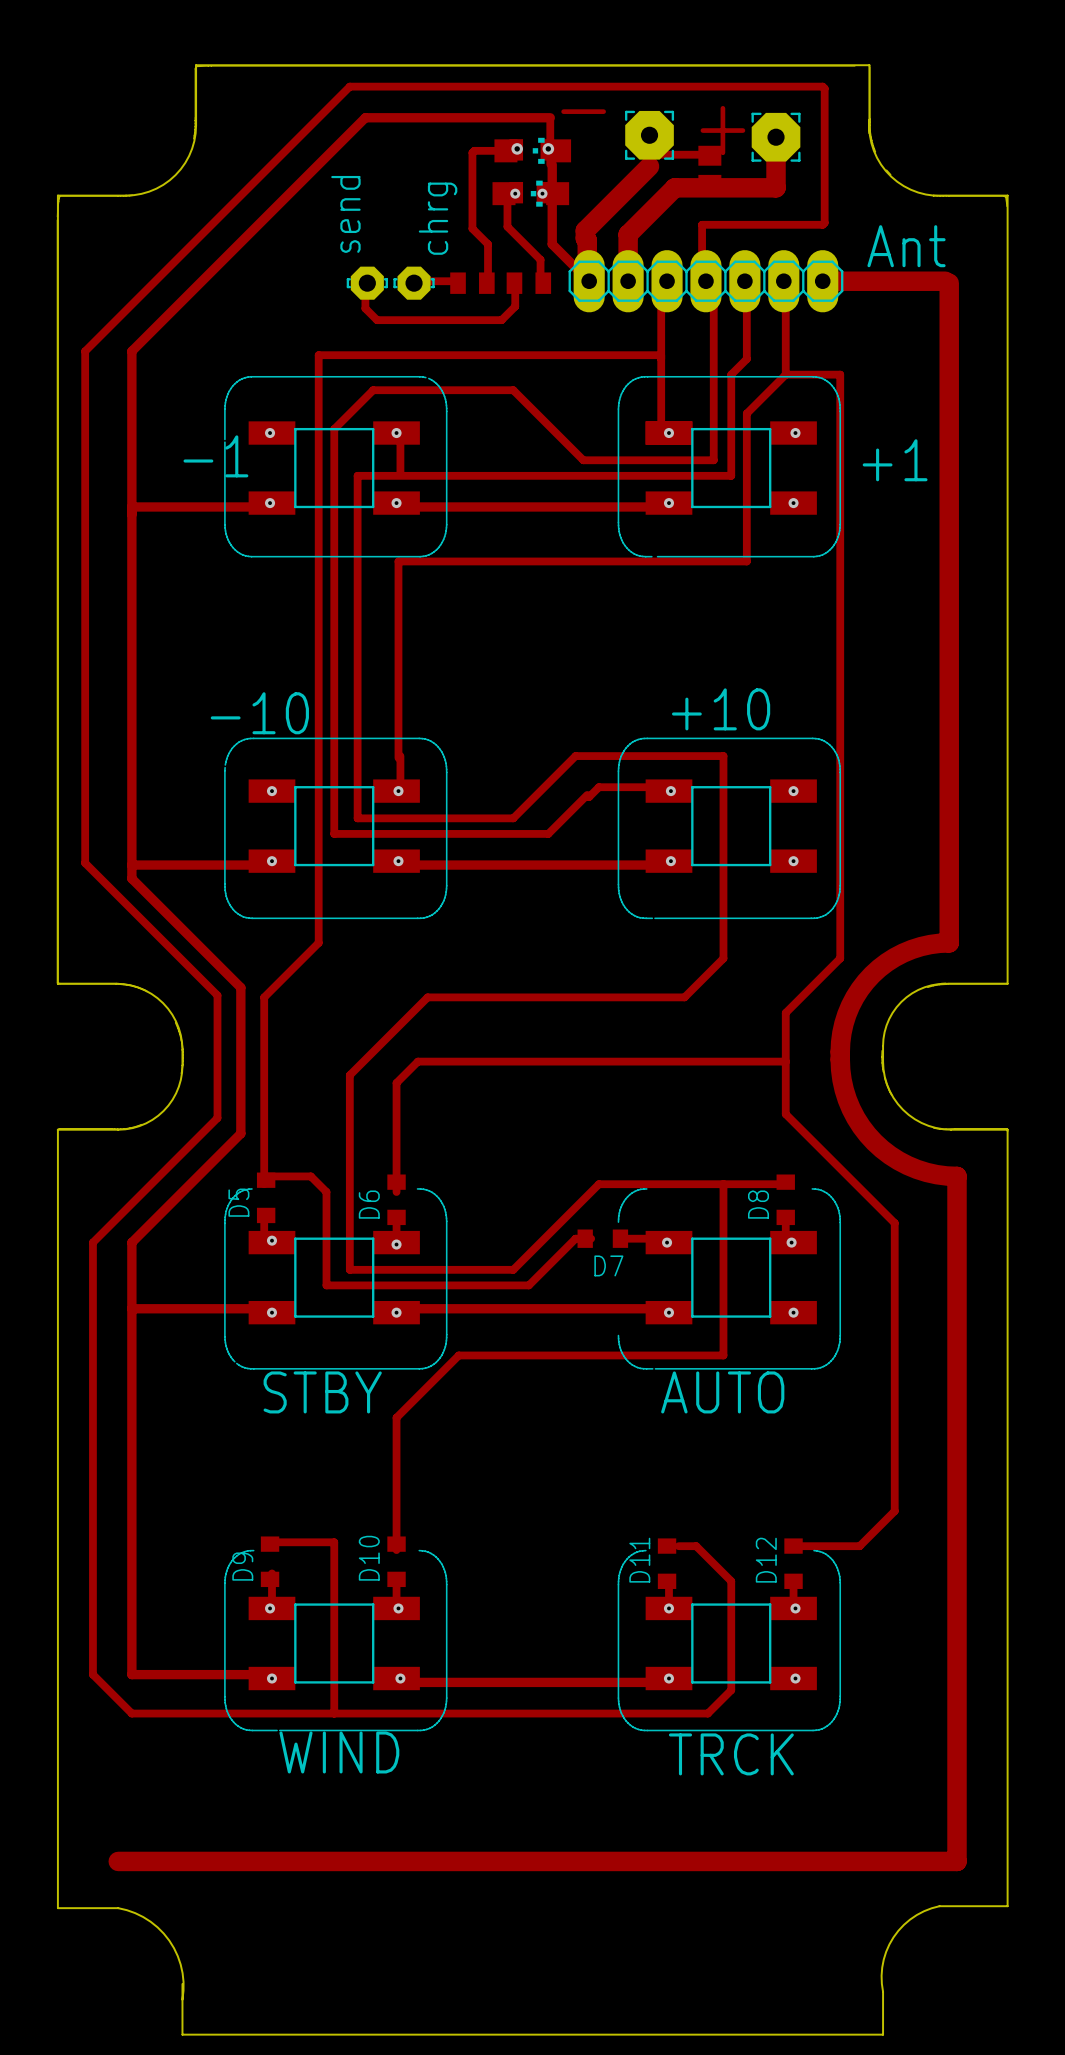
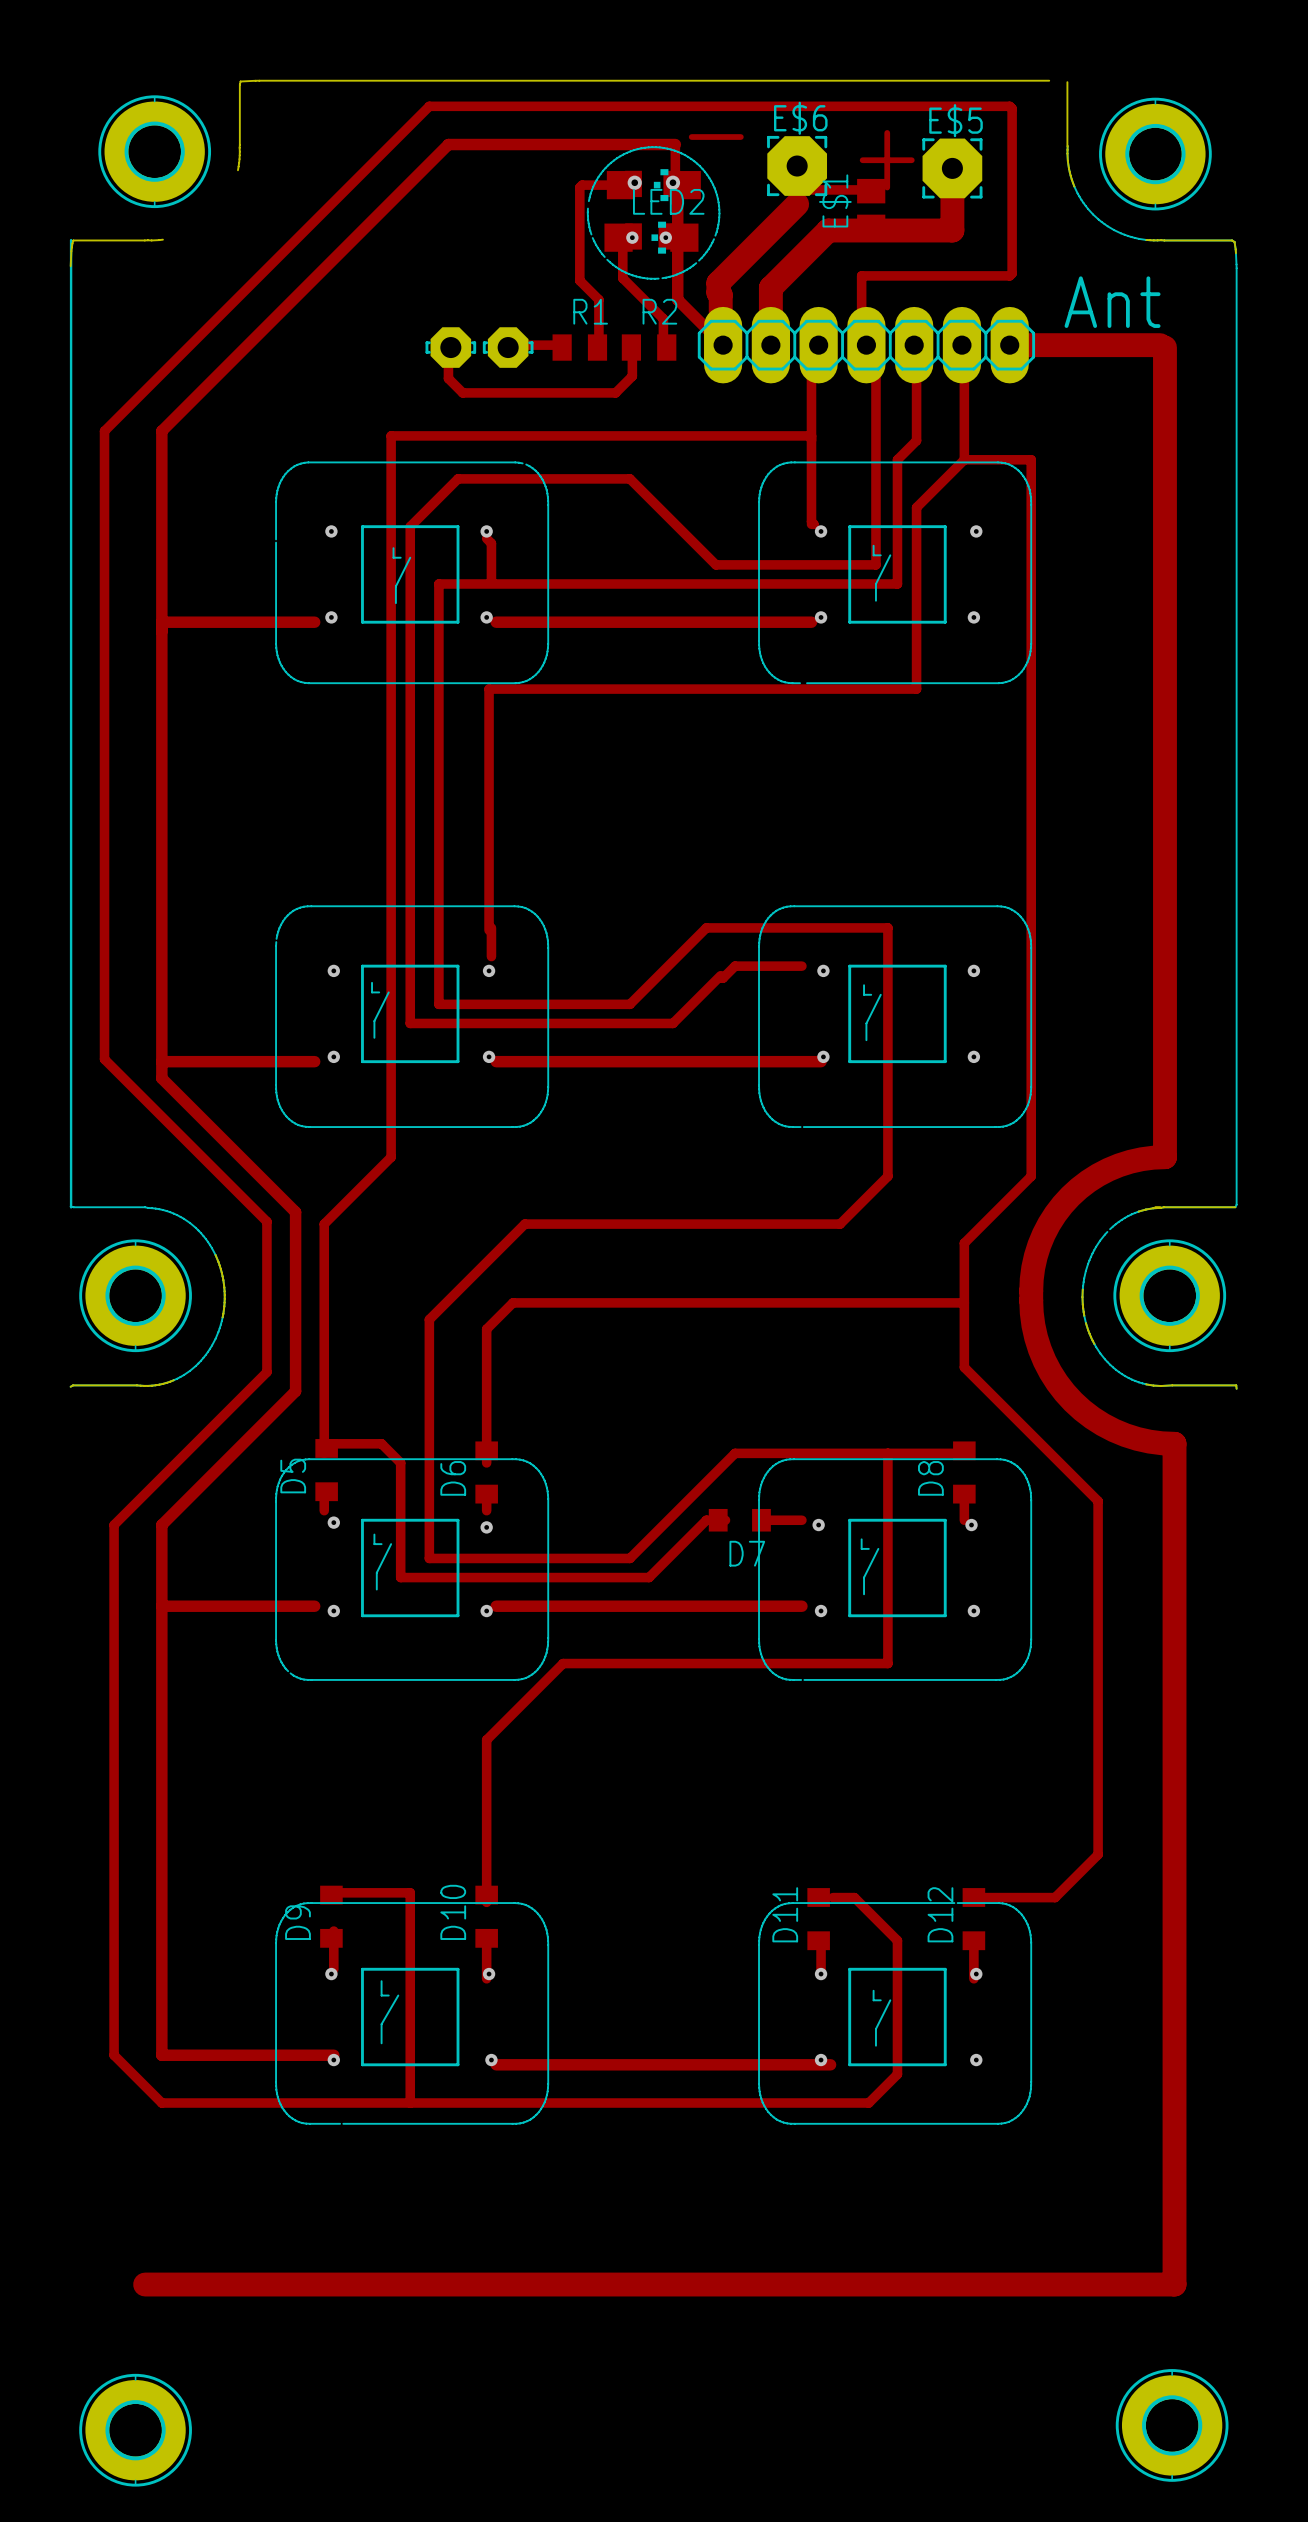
E$6 name: none -> E$6 (800, 118)
E$5 name: none -> E$5 (956, 120)
board edge: (869, 119) (869, 135) (877, 157) (891, 176) (903, 186) (918, 192) (933, 195) (1007, 195) (1007, 983) (938, 984) (918, 989) (906, 997) (892, 1012) (884, 1032) (883, 1046) (883, 1069) (889, 1091) (903, 1109) (914, 1119) (928, 1125) (943, 1129) (1007, 1129) (1007, 1906) (939, 1906) (916, 1915) (903, 1924) (889, 1944) (882, 1967) (883, 2034) (182, 2034) (182, 1984) -> none
line: none -> (1067, 146) (1068, 168) (1077, 193) (1088, 208) (1104, 224) (1124, 234) (1146, 239) (1232, 240) (1234, 241) (1236, 264) (1236, 1204) (1235, 1207) (1163, 1207) (1145, 1209) (1124, 1217) (1110, 1229)
part: none -> (154, 151)
part: none -> (1155, 154)
board edge: (869, 133) (869, 65) (196, 65) (194, 141) (185, 162) (175, 175) (163, 184) (141, 193) (57, 195) (57, 983) (123, 984) (145, 990) (163, 1003) (172, 1014) (178, 1028) (182, 1049) (182, 1072) (176, 1093) (163, 1110) (152, 1119) (139, 1126) (125, 1129) (57, 1129) (57, 1908) (118, 1908) (135, 1913) (150, 1921) (163, 1933) (177, 1956) (183, 1981) (182, 1999) -> none
line: none -> (588, 201) (598, 176) (616, 158) (641, 148) (656, 147) (670, 149) (694, 161) (711, 181) (719, 206) (718, 221) (715, 235)
E$1 name: none -> E$1 (835, 200)
LED2 name: none -> LED2 (668, 201)
line: none -> (587, 208) (591, 234)
board edge: (886, 170) (890, 174) -> none
line: none -> (592, 238) (604, 257)
line: none -> (714, 239) (699, 260)
line: none -> (71, 240) (71, 1207)
line: none -> (607, 259) (629, 274) (643, 278) (658, 278)
text: send (345, 214) -> none
line: none -> (696, 263) (680, 273) (662, 278)
text: chrg (438, 218) -> none
R1 name: none -> R1 (590, 311)
R2 name: none -> R2 (659, 311)
drawing: [248, 421, 296, 445] -> none
drawing: [373, 421, 420, 445] -> none
drawing: [645, 421, 693, 445] -> none
drawing: [770, 421, 817, 445] -> none
line: none -> (873, 545) (873, 555) (880, 555)
line: none -> (393, 548) (393, 557) (400, 557)
line: none -> (890, 555) (875, 583) (875, 600)
line: none -> (410, 557) (395, 586) (395, 603)
text: -1 (215, 456) -> none
text: +1 (895, 460) -> none
drawing: [248, 491, 296, 515] -> none
drawing: [373, 491, 420, 515] -> none
drawing: [645, 491, 693, 515] -> none
drawing: [770, 491, 817, 515] -> none
text: +10 (721, 709) -> none
text: -10 (259, 713) -> none
drawing: [248, 779, 296, 803] -> none
drawing: [373, 779, 420, 803] -> none
drawing: [645, 779, 693, 803] -> none
drawing: [770, 779, 817, 803] -> none
line: none -> (372, 982) (372, 992) (379, 992)
line: none -> (864, 985) (864, 994) (871, 994)
line: none -> (388, 992) (374, 1021) (374, 1037)
line: none -> (880, 994) (866, 1023) (866, 1040)
drawing: [248, 849, 296, 873] -> none
drawing: [373, 849, 420, 873] -> none
drawing: [645, 849, 693, 873] -> none
drawing: [770, 849, 817, 873] -> none
line: none -> (70, 1206) (145, 1207) (166, 1211) (183, 1218) (201, 1233) (212, 1248) (221, 1272) (224, 1295) (222, 1317) (215, 1338) (201, 1360) (183, 1375) (170, 1381) (151, 1385) (70, 1386)
line: none -> (1107, 1231) (1096, 1246) (1088, 1263) (1082, 1297) (1088, 1330) (1096, 1347) (1105, 1359) (1125, 1376) (1146, 1384) (1236, 1385) (1236, 1388)
part: none -> (135, 1295)
part: none -> (1169, 1295)
line: none -> (309, 1459) (512, 1459)
line: none -> (793, 1459) (996, 1459)
line: none -> (759, 1499) (759, 1639)
drawing: [248, 1230, 296, 1255] -> none
drawing: [373, 1230, 420, 1255] -> none
drawing: [645, 1230, 693, 1255] -> none
drawing: [770, 1230, 817, 1255] -> none
line: none -> (374, 1534) (374, 1544) (381, 1544)
line: none -> (861, 1539) (861, 1548) (868, 1548)
line: none -> (391, 1544) (376, 1572) (376, 1589)
line: none -> (878, 1548) (864, 1577) (864, 1594)
drawing: [248, 1300, 296, 1325] -> none
drawing: [373, 1300, 420, 1325] -> none
drawing: [645, 1300, 693, 1325] -> none
drawing: [770, 1300, 817, 1325] -> none
text: STBY (322, 1392) -> none
text: AUTO (722, 1392) -> none
line: none -> (311, 1903) (514, 1903)
line: none -> (792, 1903) (954, 1903)
line: none -> (957, 1903) (998, 1903)
drawing: [248, 1596, 296, 1621] -> none
drawing: [373, 1596, 420, 1621] -> none
drawing: [645, 1596, 693, 1621] -> none
drawing: [770, 1596, 817, 1621] -> none
line: none -> (381, 1981) (381, 1995) (388, 1995)
line: none -> (873, 1990) (873, 2000) (880, 2000)
line: none -> (398, 1995) (381, 2024) (381, 2043)
line: none -> (890, 2000) (875, 2028) (875, 2045)
drawing: [248, 1666, 296, 1691] -> none
drawing: [373, 1666, 420, 1691] -> none
drawing: [645, 1666, 693, 1691] -> none
drawing: [770, 1666, 817, 1691] -> none
text: WIND (339, 1752) -> none
text: TRCK (731, 1754) -> none
part: none -> (1172, 2425)
part: none -> (135, 2430)

